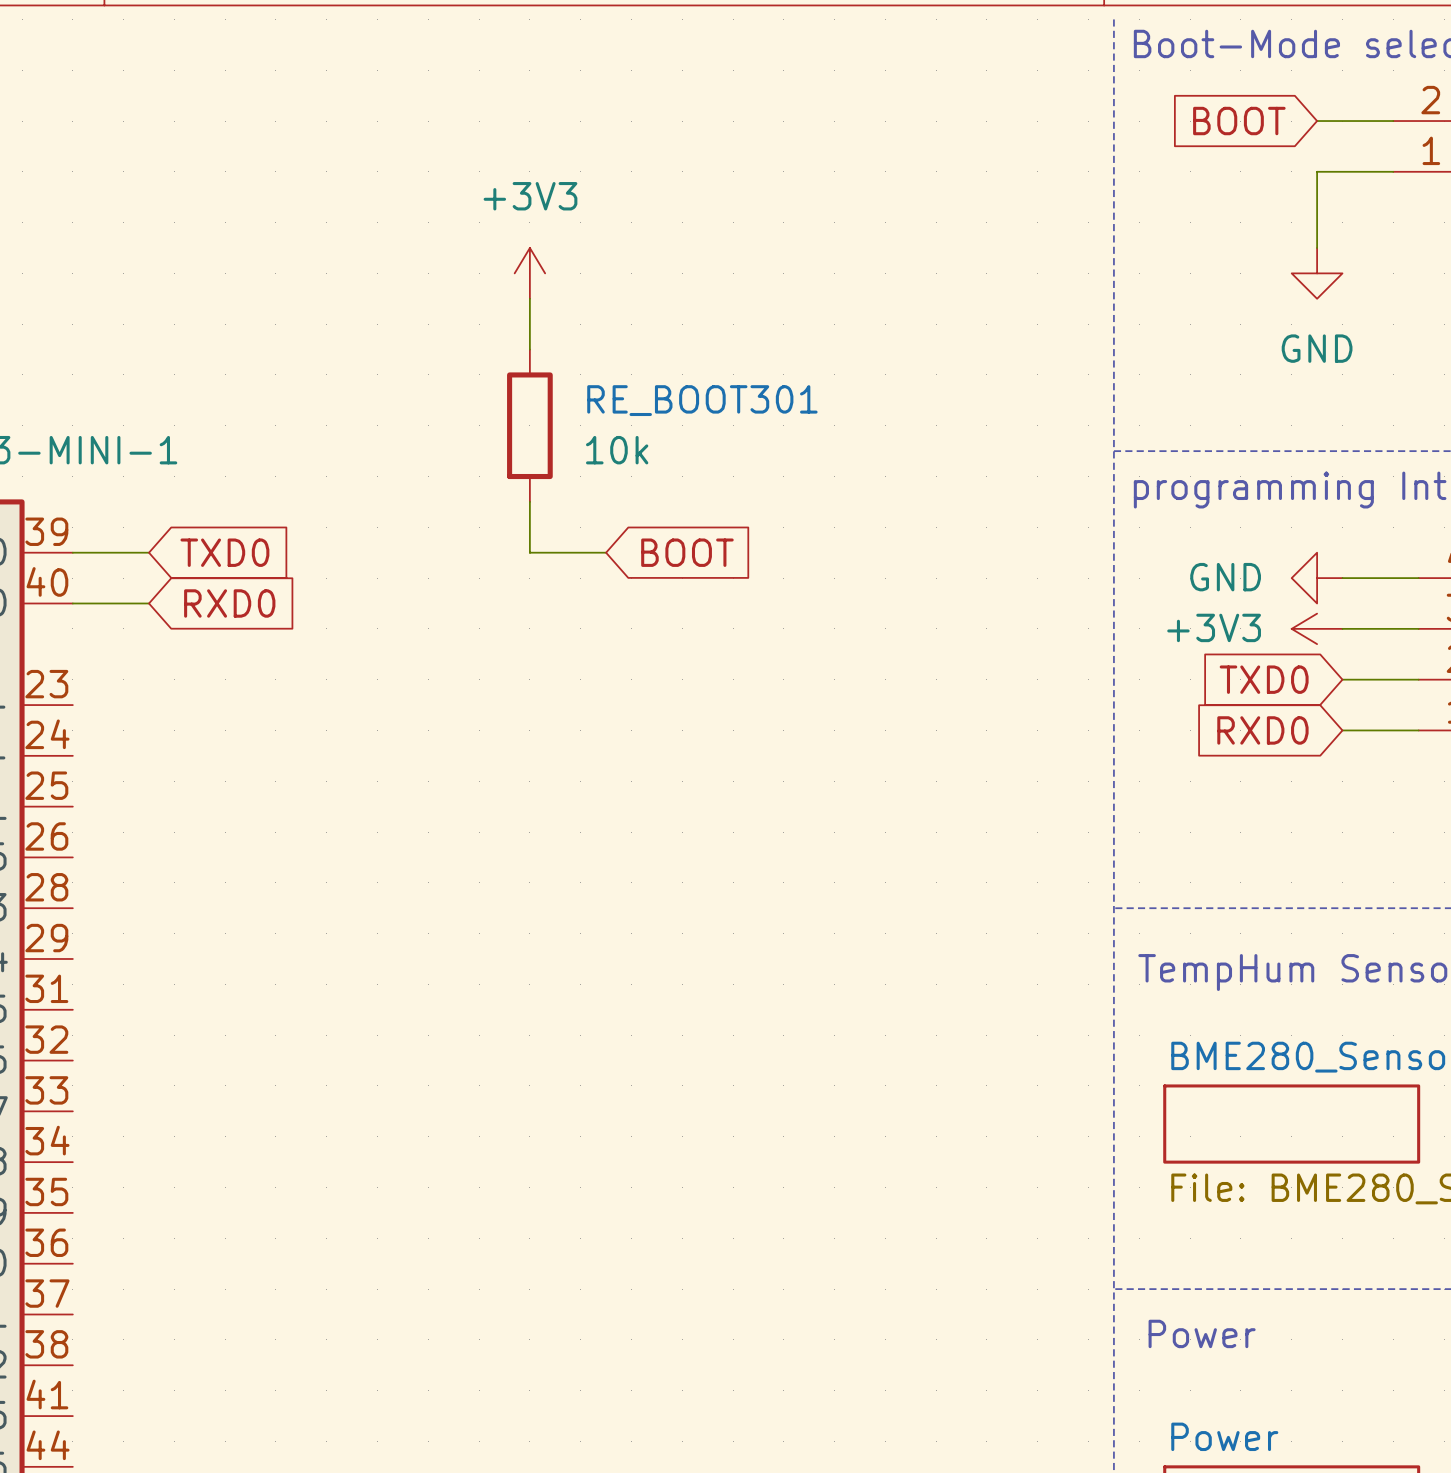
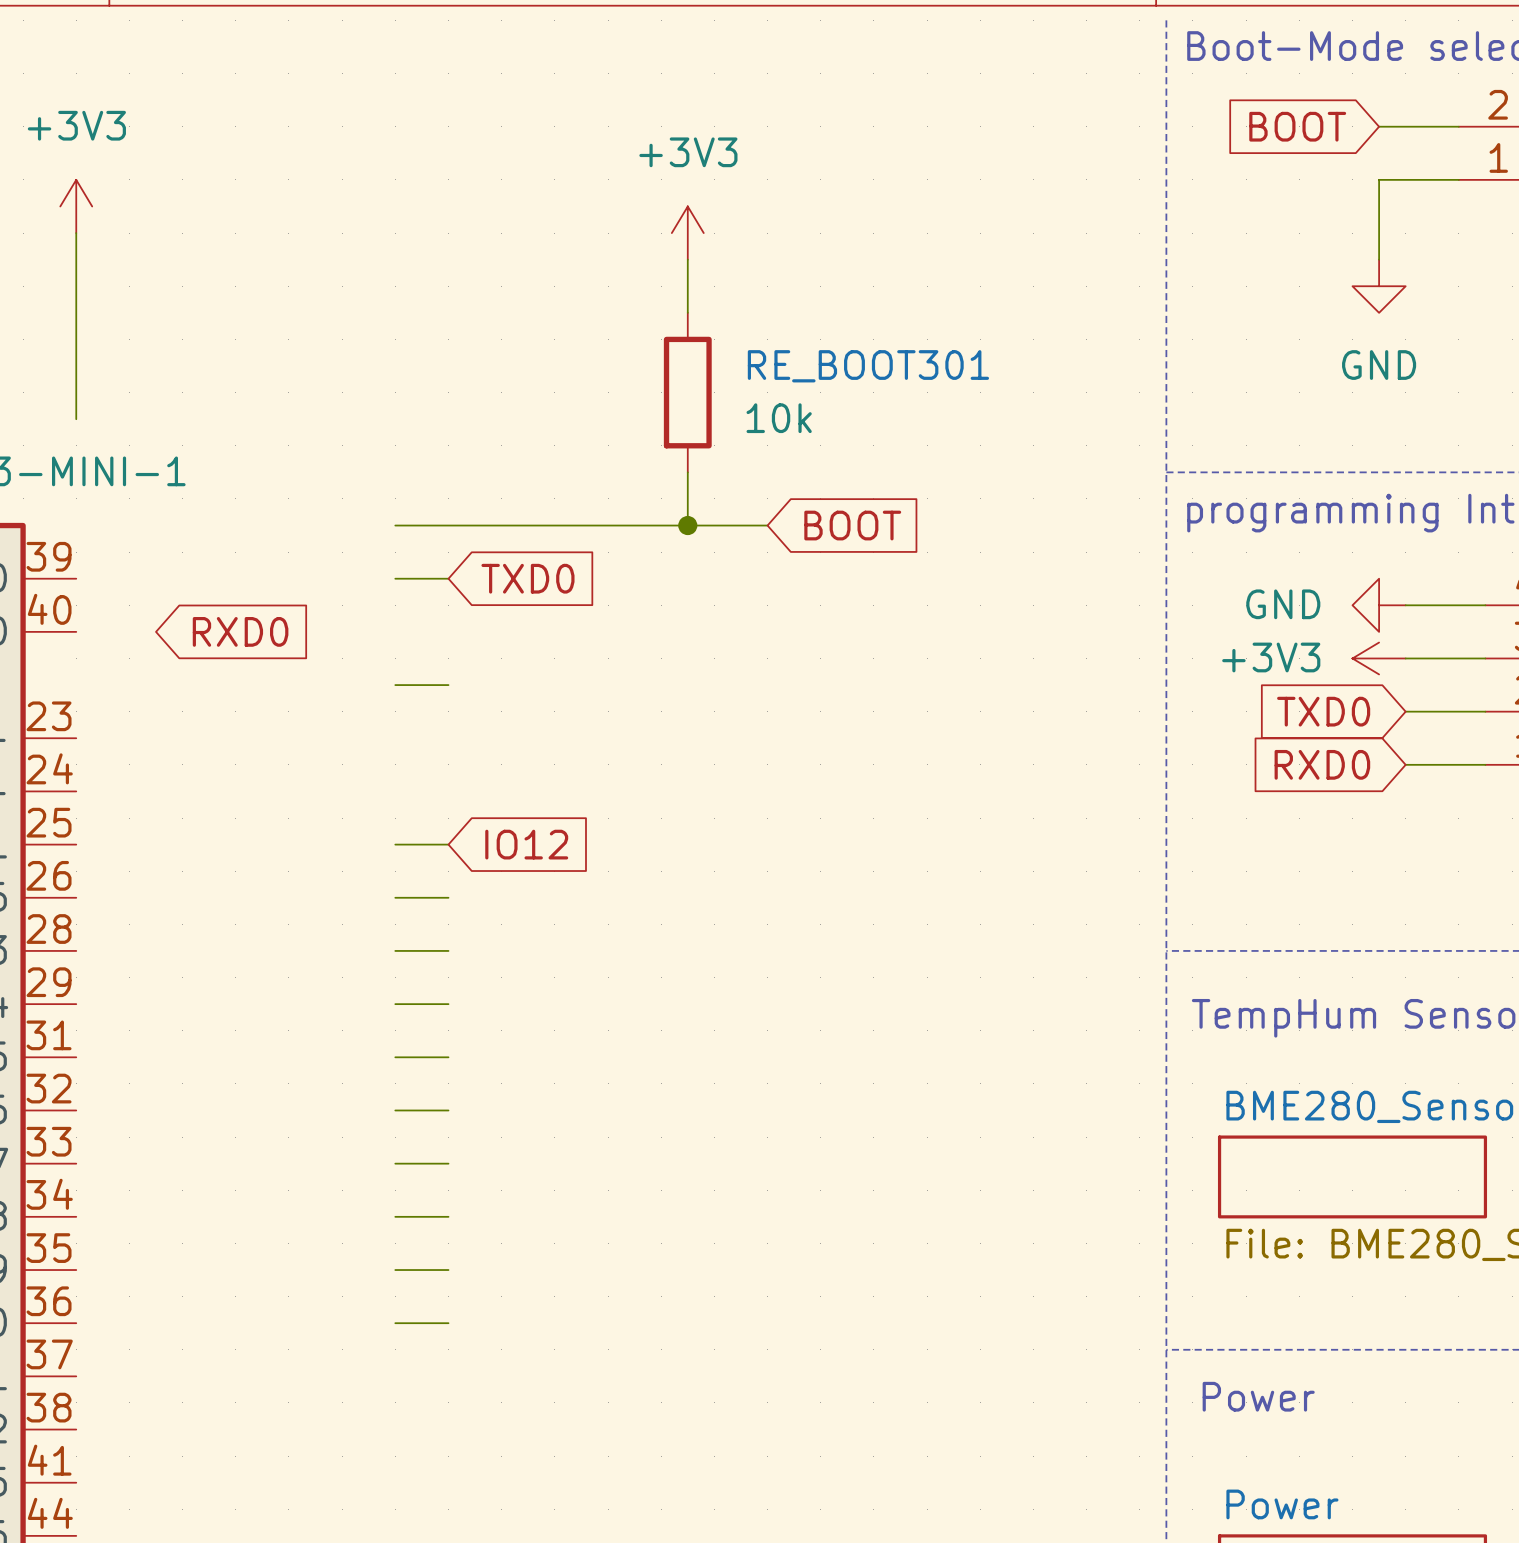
power symbol: none -> +3V3 (76, 206)
wire: none -> (76, 233) (76, 419)
power symbol position: +3V3 (529, 273) -> +3V3 (687, 233)
wire: (529, 298) (529, 349) -> (687, 259) (687, 312)
RE_BOOT301 position: (529, 425) -> (687, 392)
wire: none -> (687, 472) (687, 525)
wire: none -> (395, 525) (767, 525)
wire: (529, 501) (529, 552) (606, 552) -> none
junction: none -> (687, 525)
wire: (72, 552) (149, 552) -> none
global label position: TXD0 (224, 552) -> TXD0 (527, 578)
wire: none -> (395, 578) (448, 578)
global label position: BOOT (687, 552) -> BOOT (852, 525)
wire: (72, 603) (149, 603) -> none
wire: none -> (395, 685) (448, 685)
wire: none -> (395, 844) (448, 844)
global label: none -> IO12 (526, 844)
wire: none -> (395, 897) (448, 897)
wire: none -> (395, 950) (448, 950)
wire: none -> (395, 1004) (448, 1004)
wire: none -> (395, 1057) (448, 1057)
wire: none -> (395, 1110) (448, 1110)
wire: none -> (395, 1163) (448, 1163)
wire: none -> (395, 1216) (448, 1216)
wire: none -> (395, 1270) (448, 1270)
wire: none -> (395, 1323) (448, 1323)

